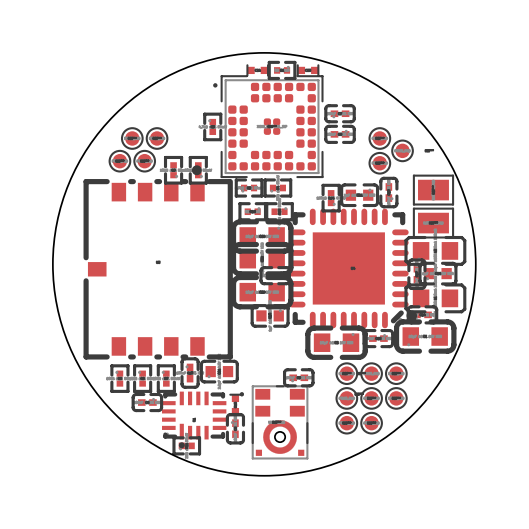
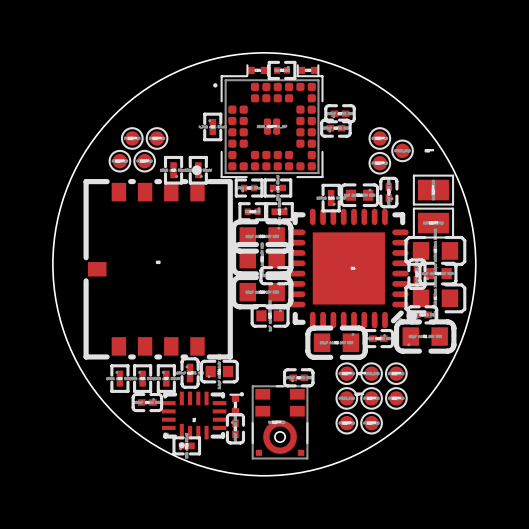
part rotation: 0° (340, 134) -> 180° (335, 128)

